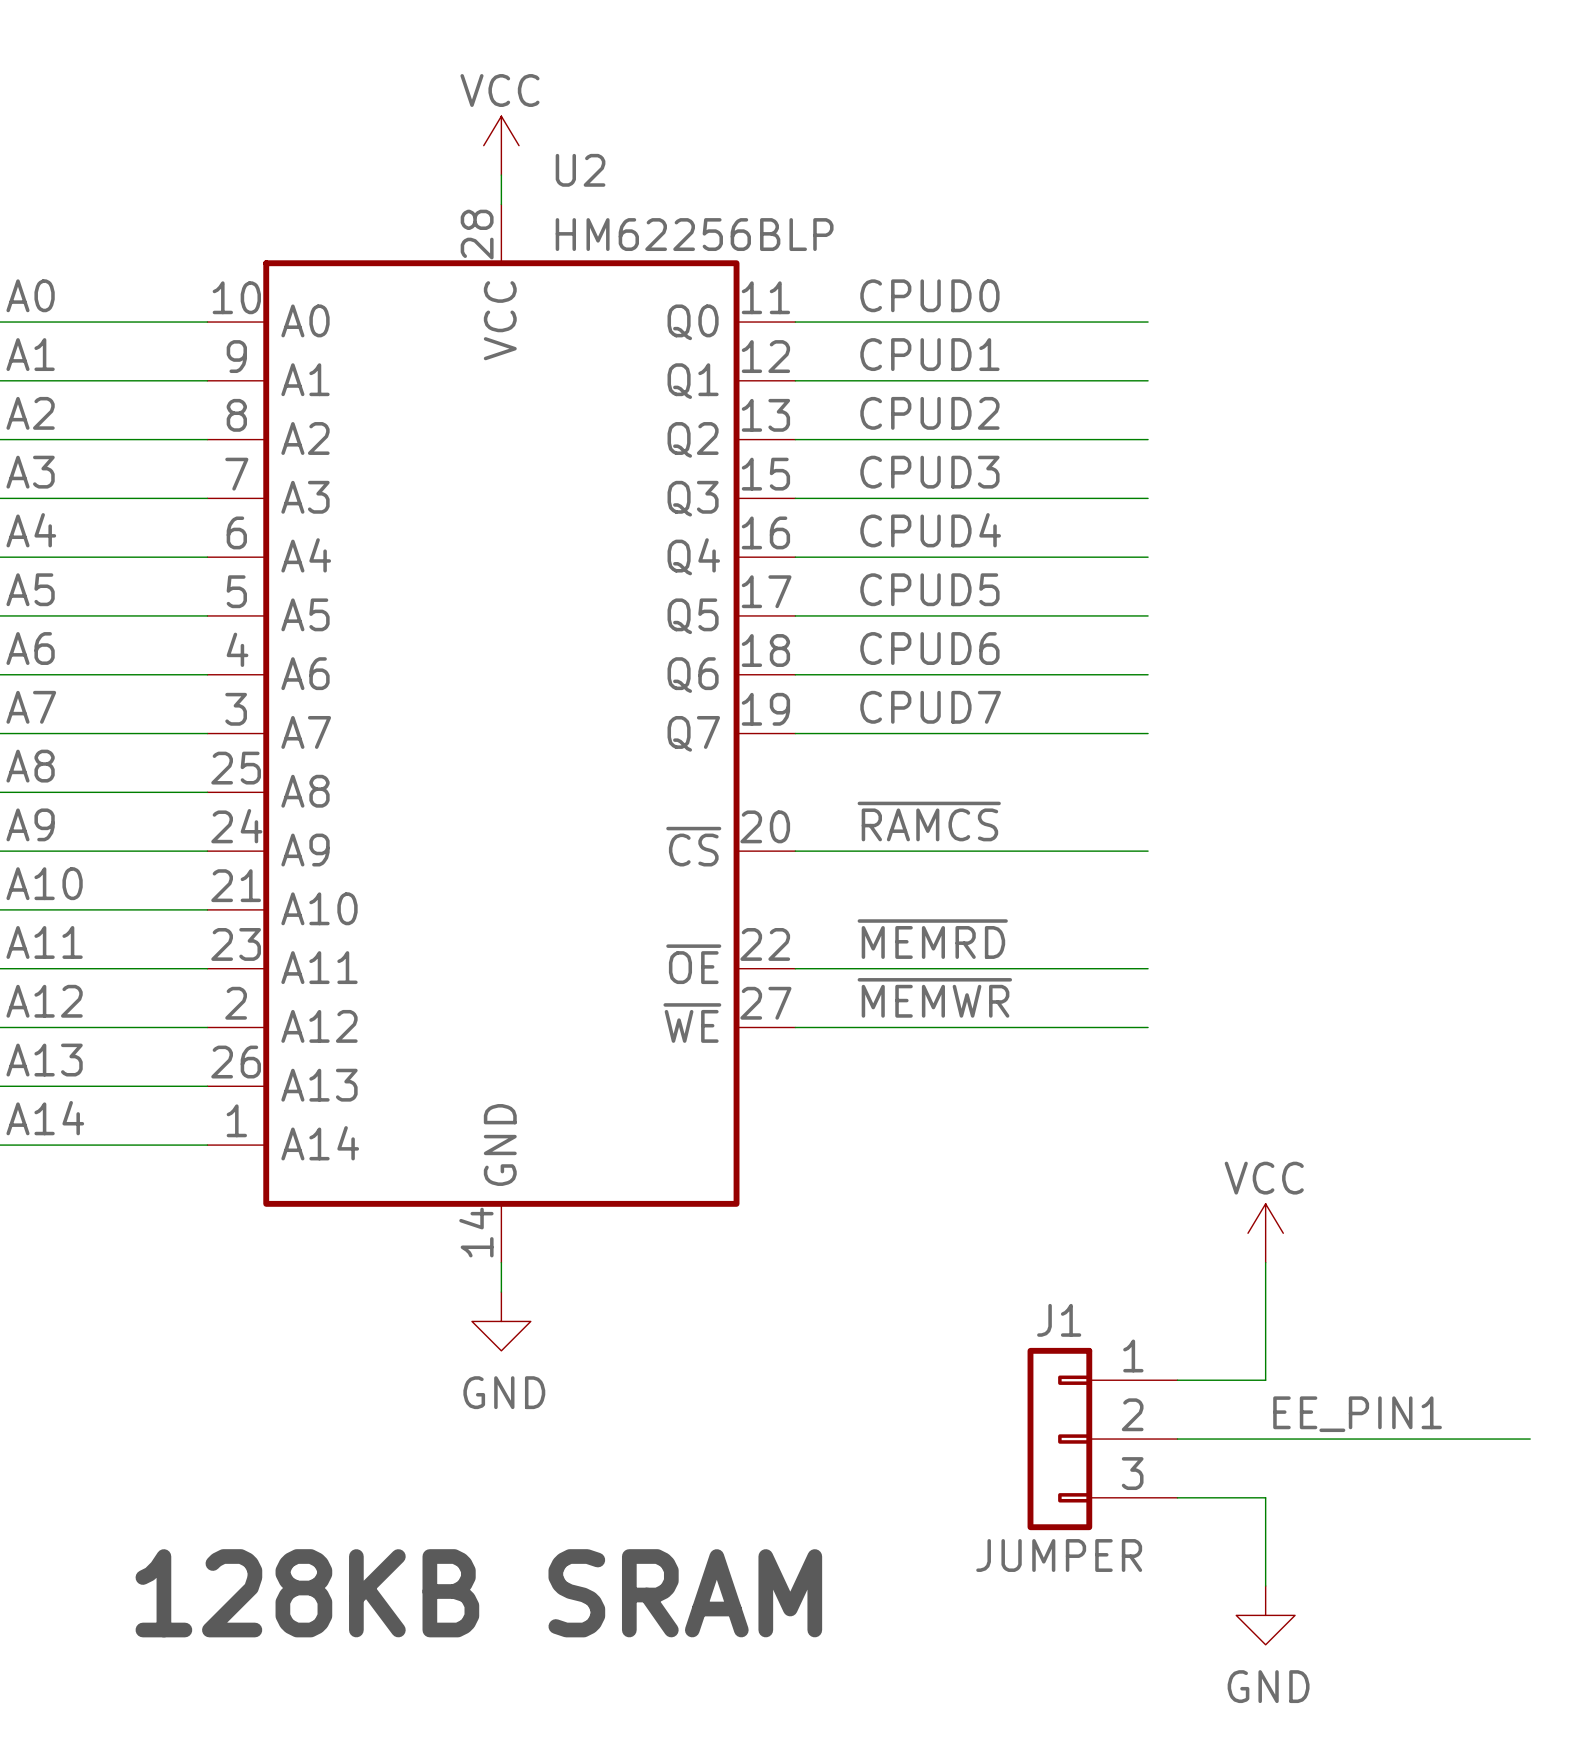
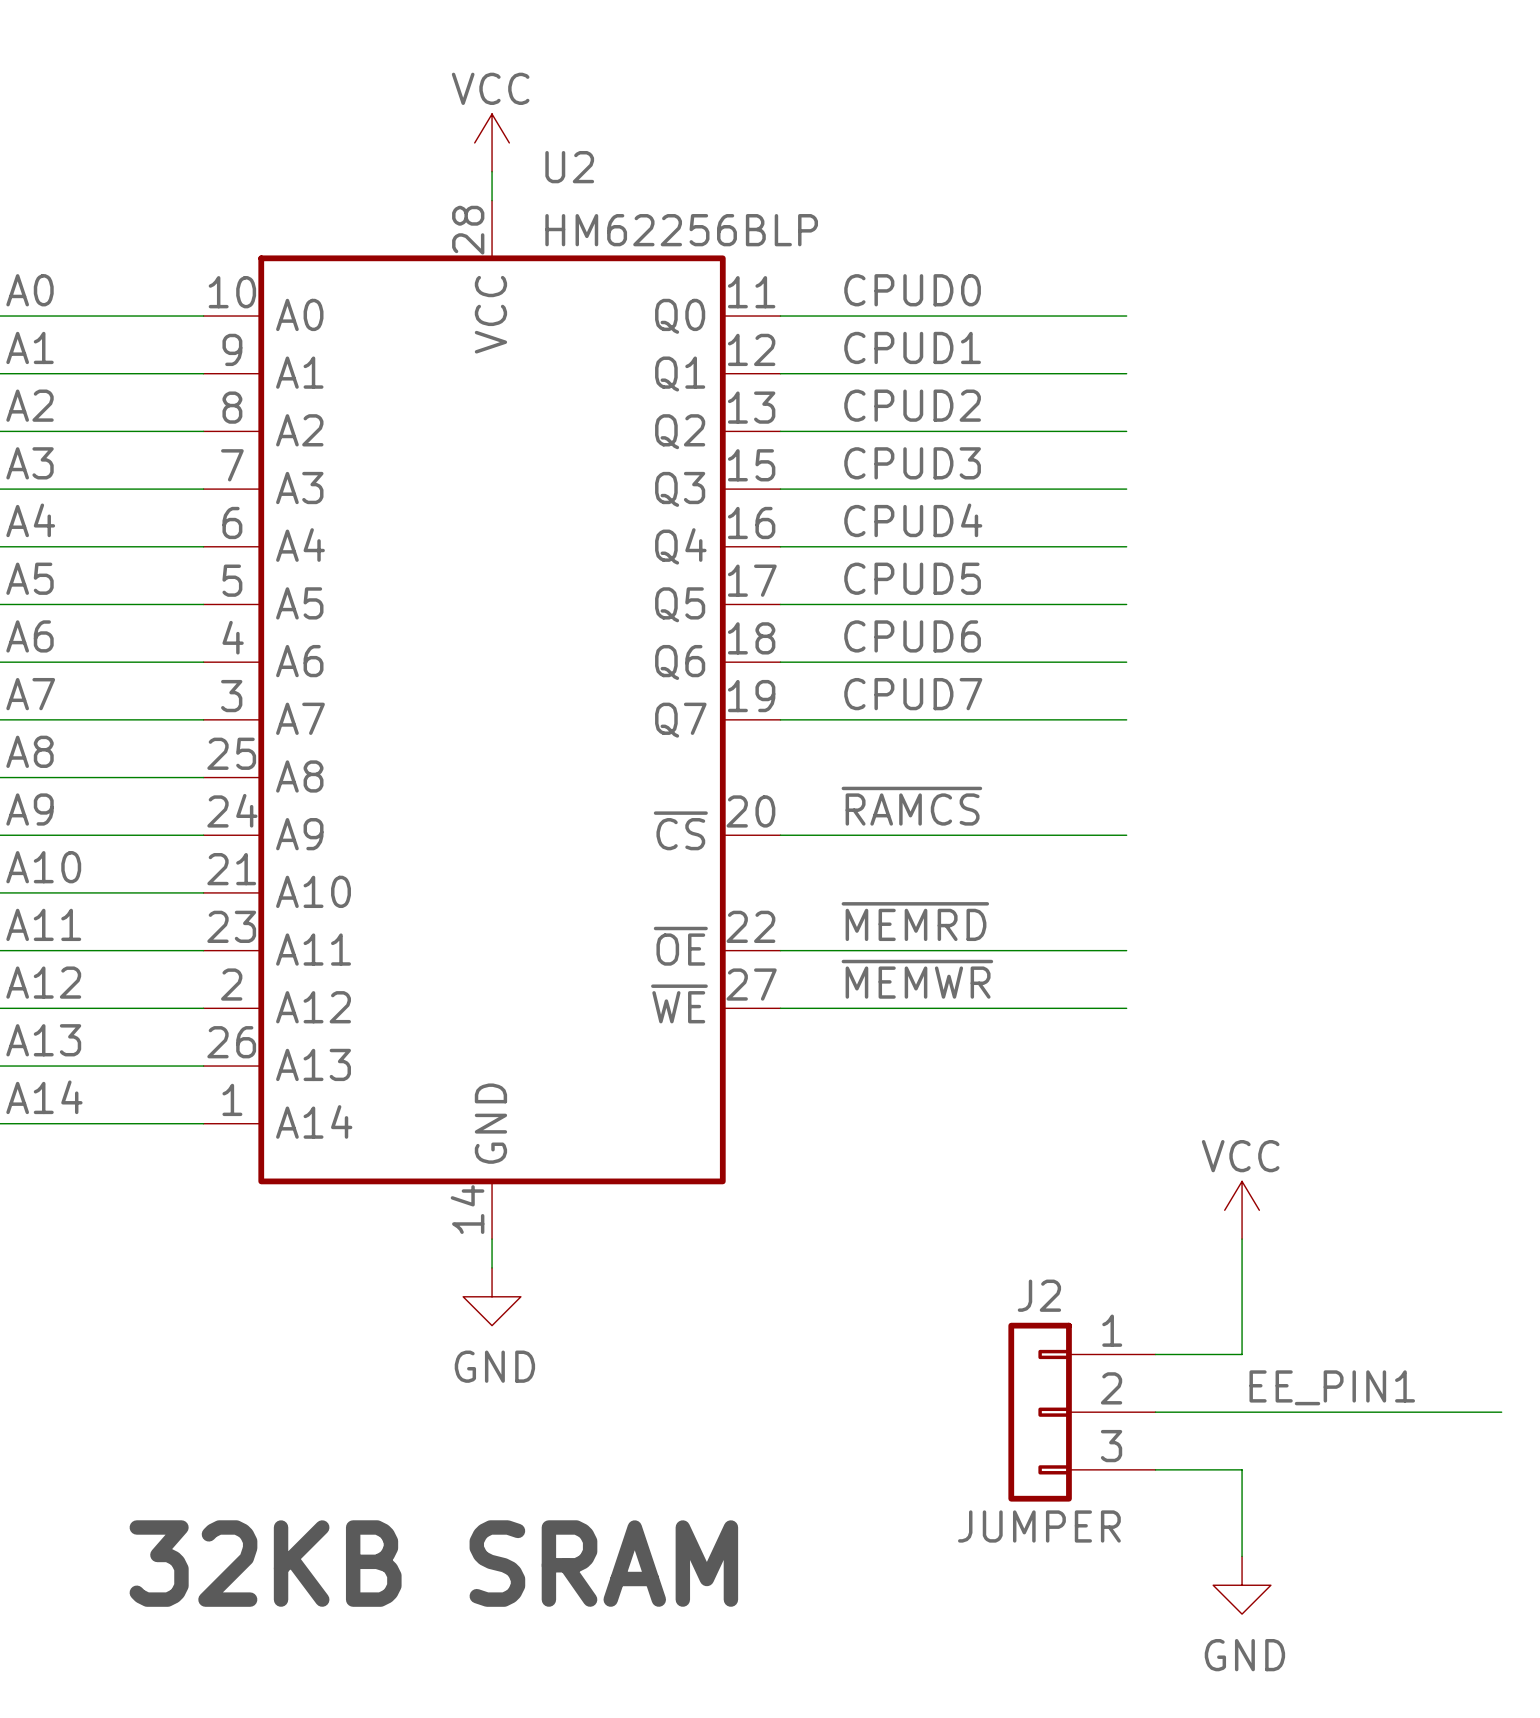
J1 name: J1 (1059, 1320) -> J2 (1039, 1295)
text: 128KB SRAM (478, 1593) -> 32KB SRAM (433, 1563)

